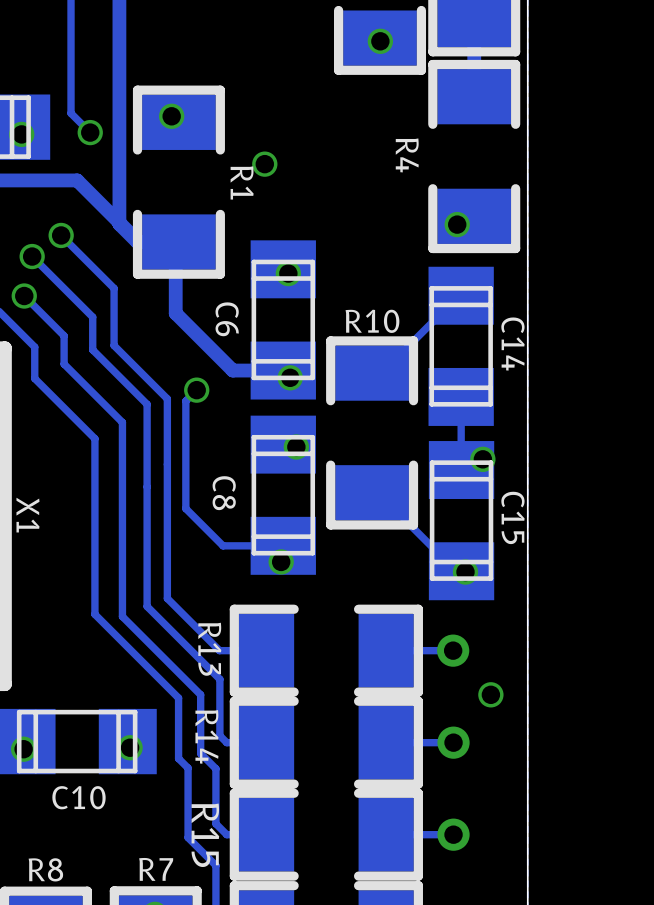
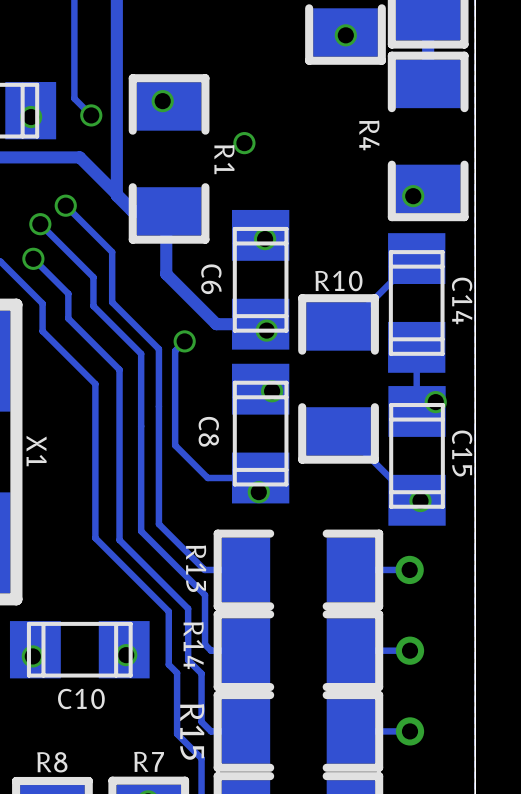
via: (490, 694) -> none

